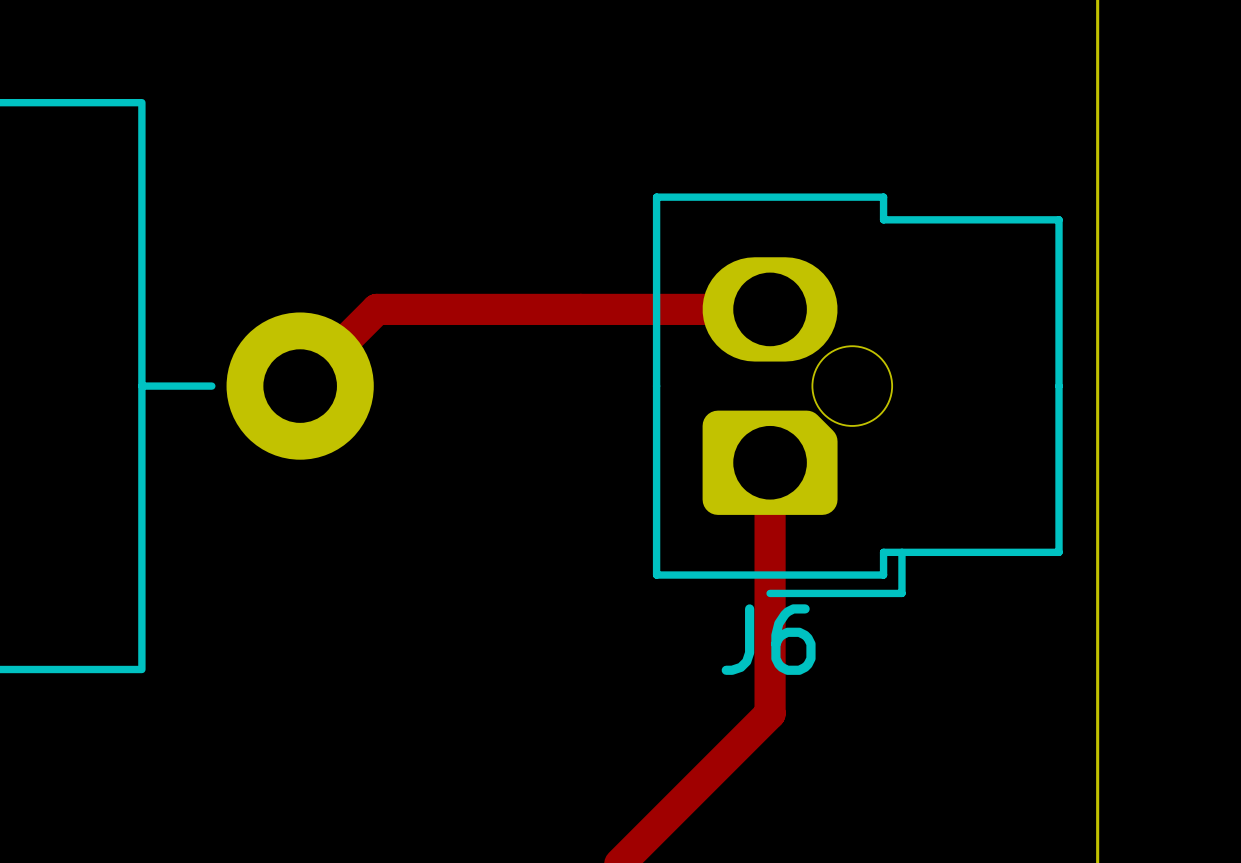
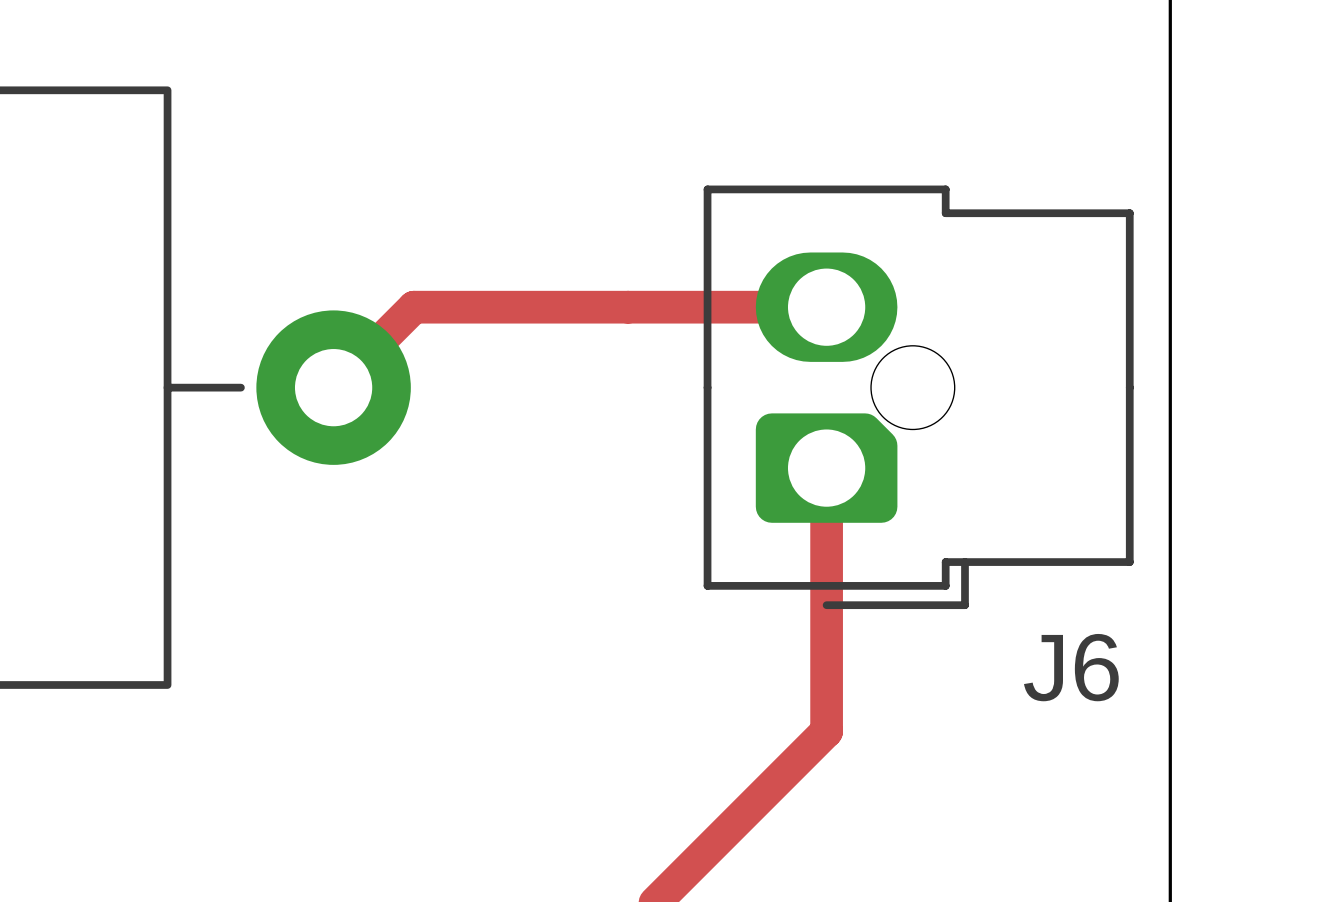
J6 name position: J6 (768, 639) -> J6 (1071, 667)

